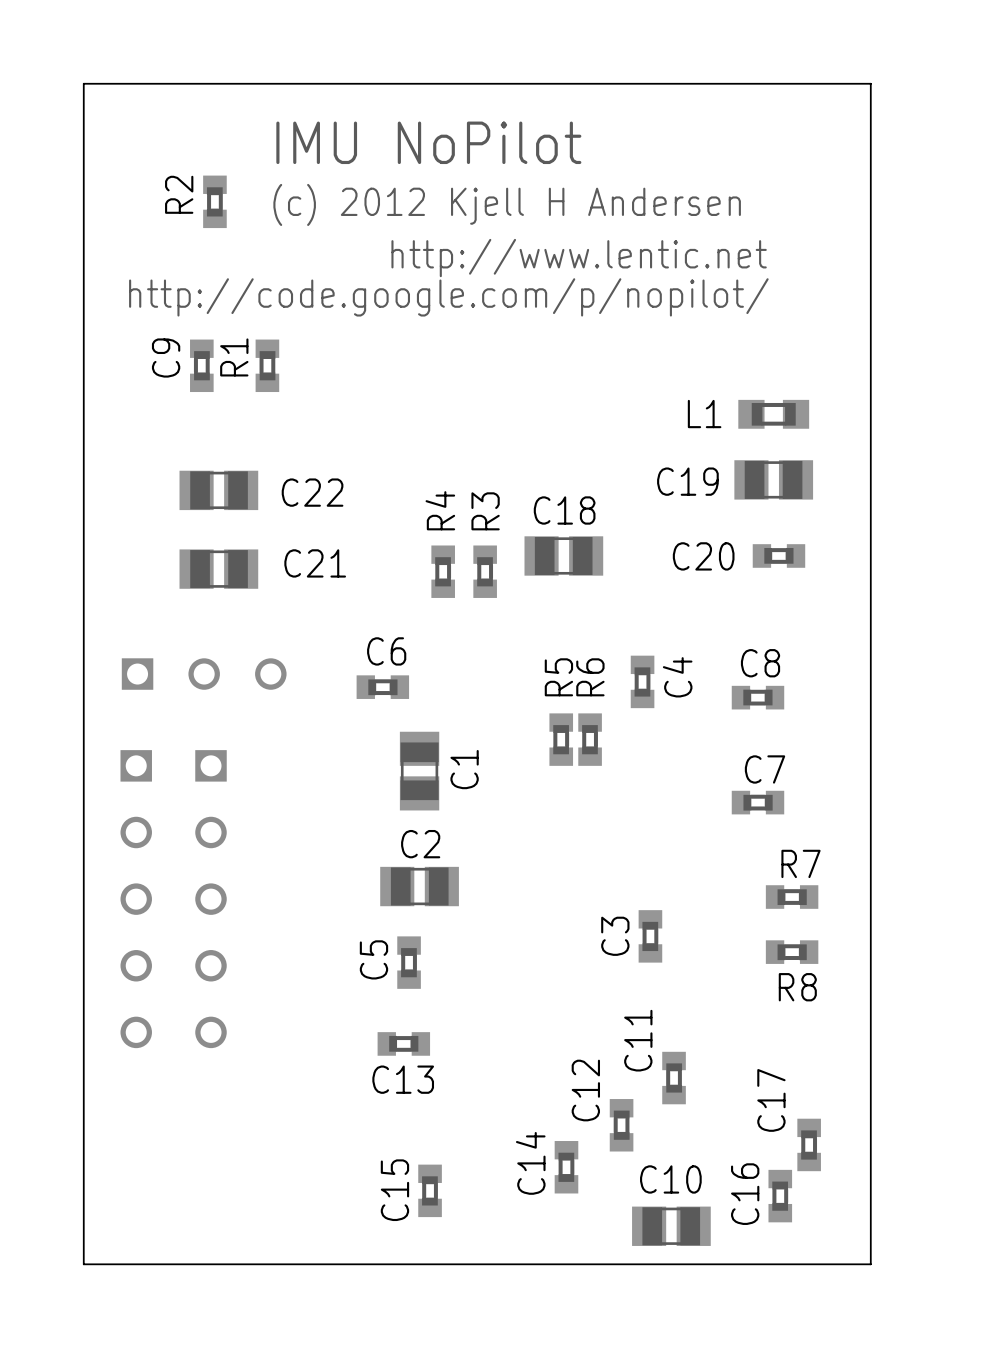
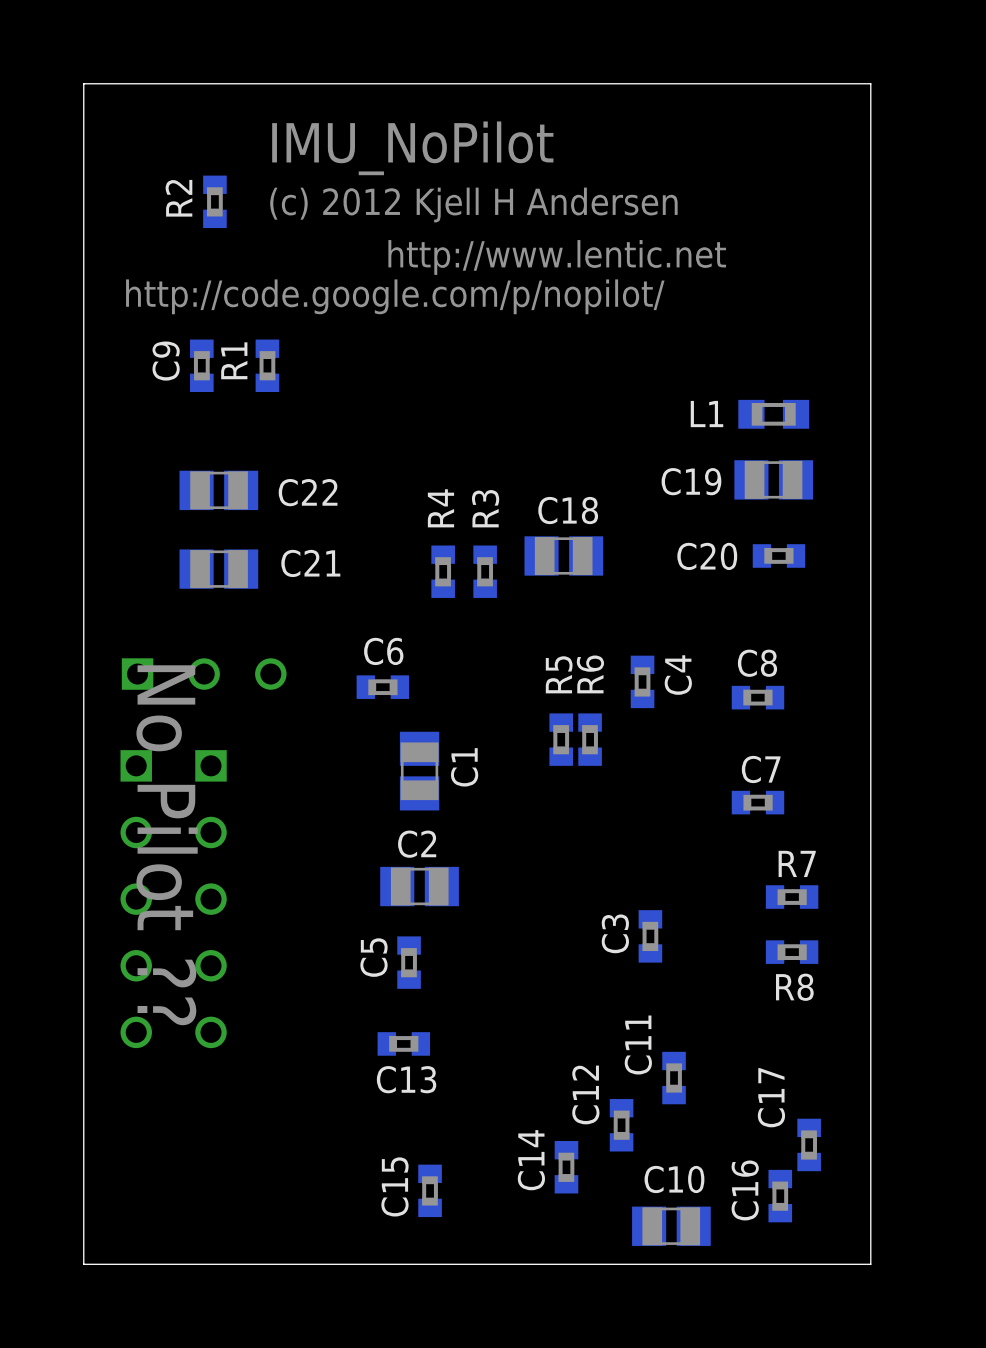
text: IMU NoPilot (428, 142) -> IMU_NoPilot (412, 148)
text: none -> No Pilot ?? (167, 845)

